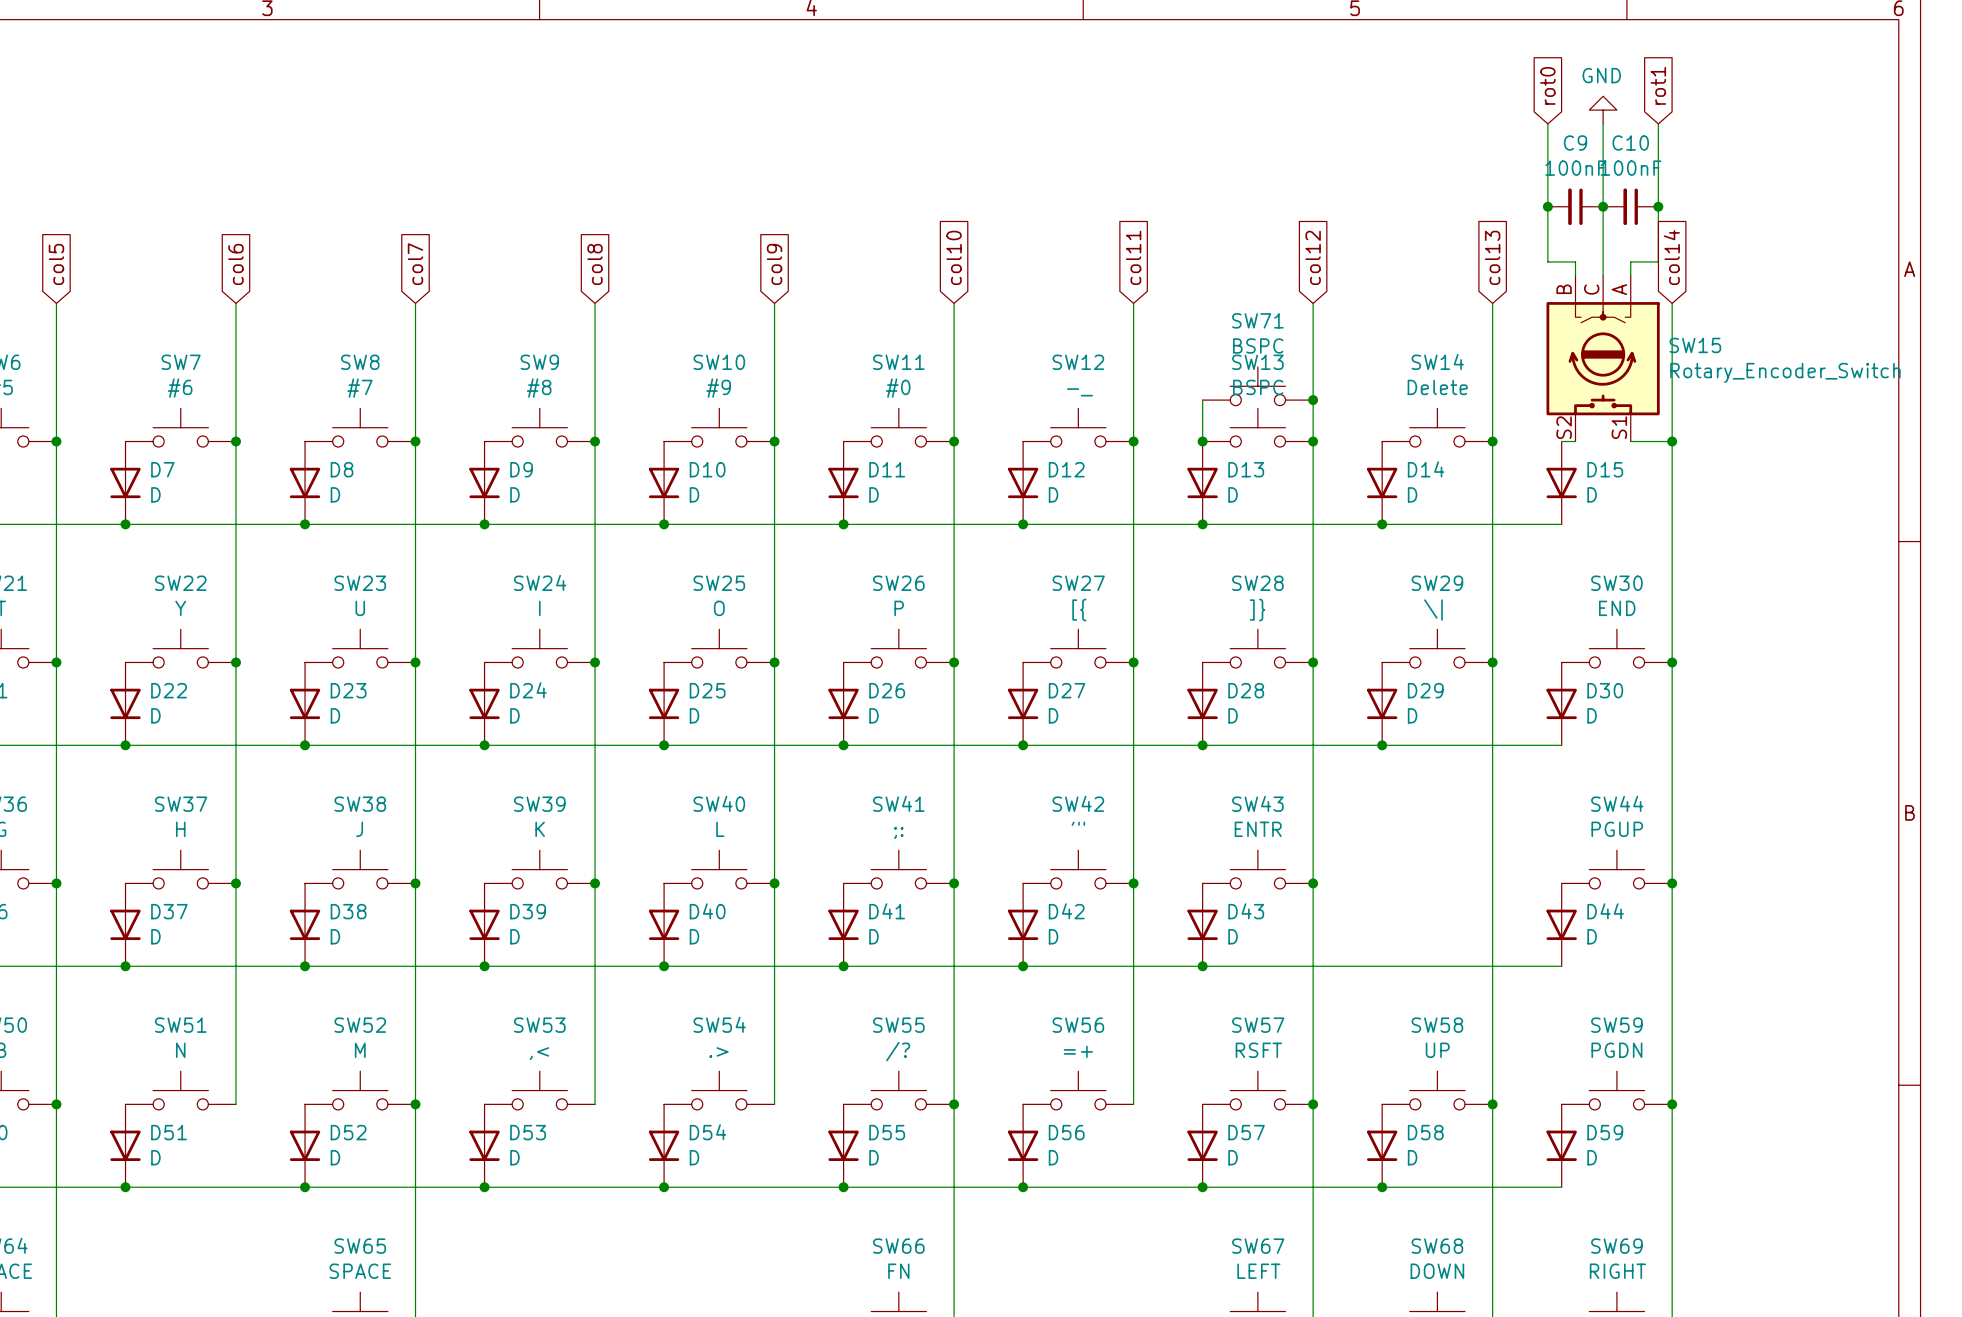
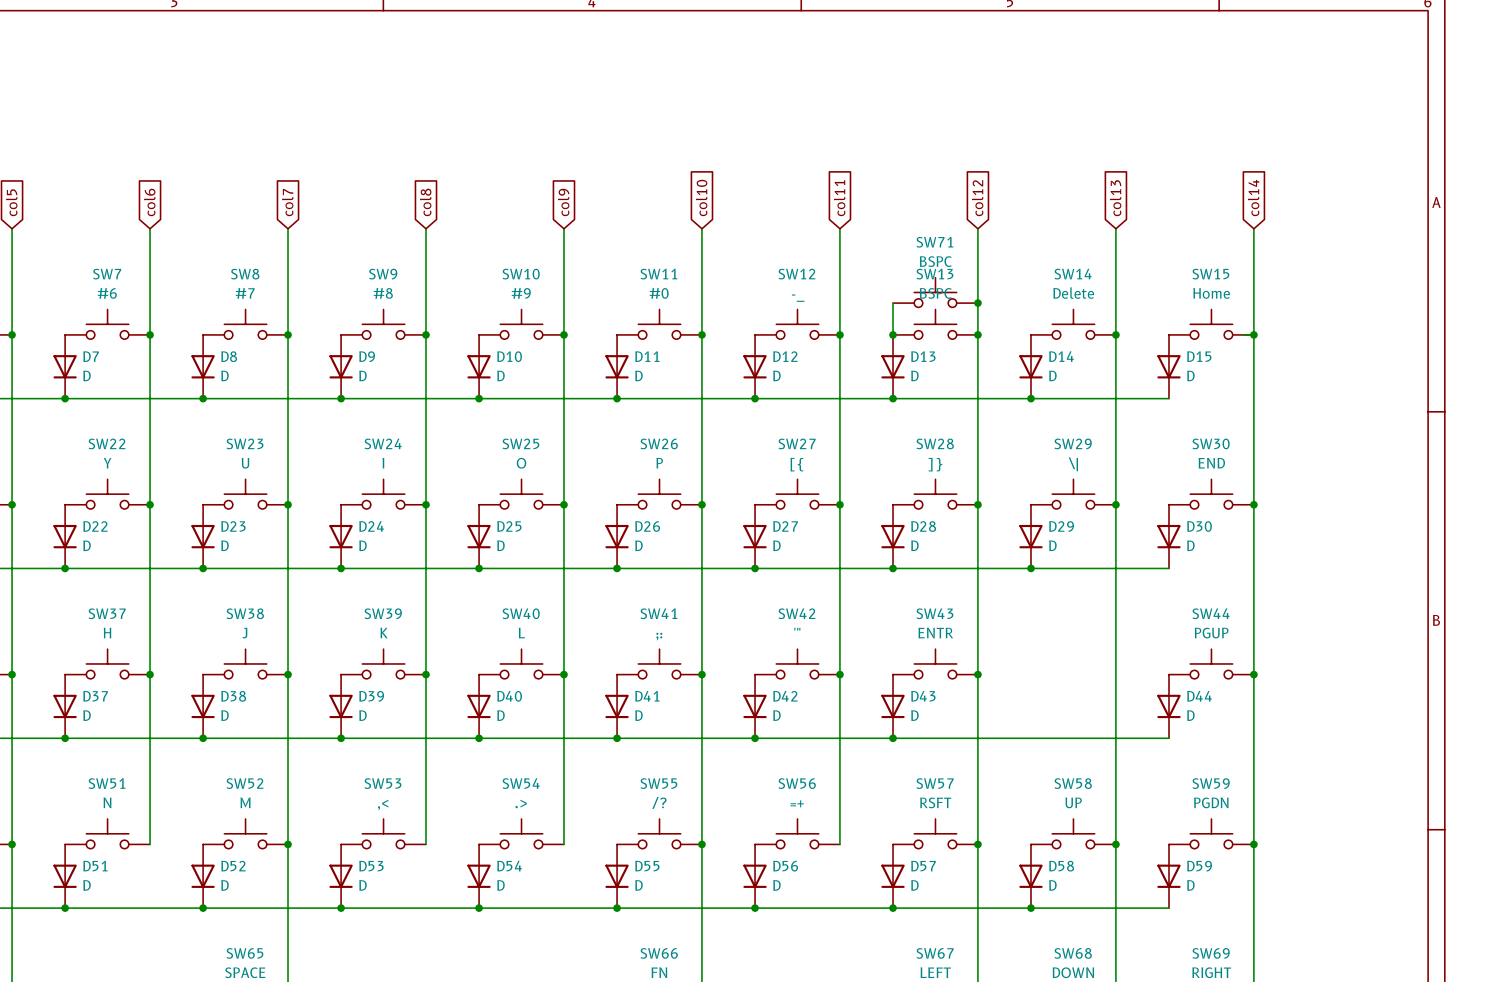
global label: rot0 (1547, 85) -> none
global label: rot1 (1658, 85) -> none
power symbol: GND (1603, 110) -> none
wire: (1547, 123) (1547, 261) (1575, 261) (1575, 275) -> none
wire: (1603, 123) (1603, 275) -> none
wire: (1658, 123) (1658, 261) (1630, 261) (1630, 275) -> none
junction: (1547, 206) -> none
C9: 100nF (1575, 206) -> none
junction: (1603, 206) -> none
C10: 100nF (1630, 206) -> none
junction: (1658, 206) -> none
SW15 symbol: [1546, 275, 1660, 442] -> [1168, 309, 1254, 340]
SW15 name position: SW15 (1695, 345) -> SW15 (1210, 274)
SW15 value: Rotary_Encoder_Switch (1785, 372) -> Home (1211, 293)

